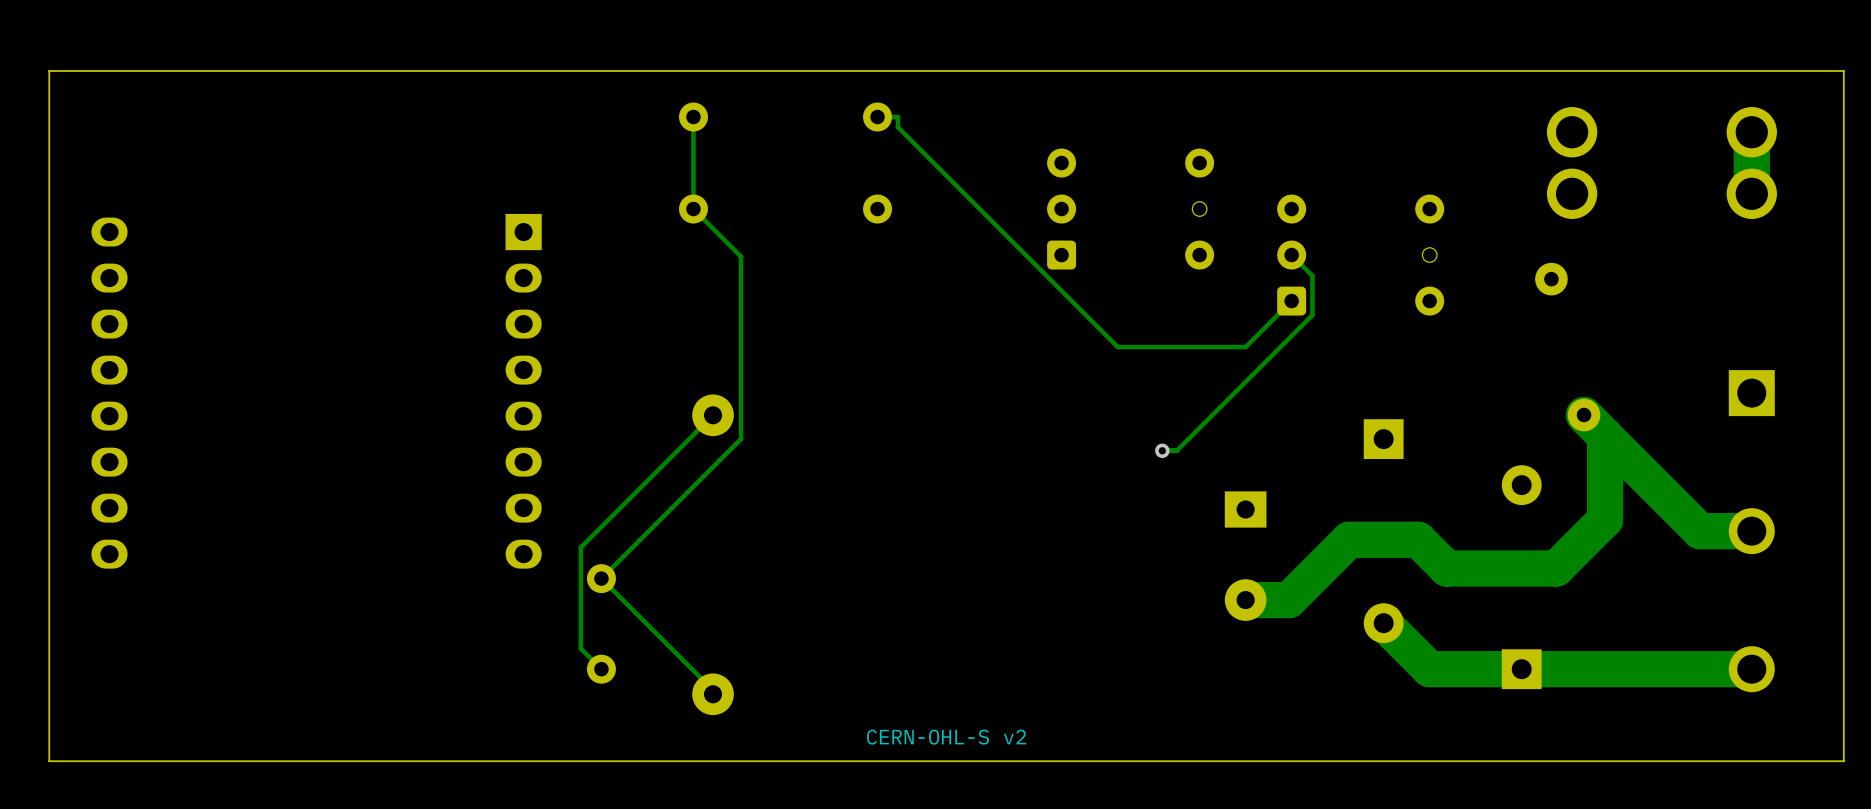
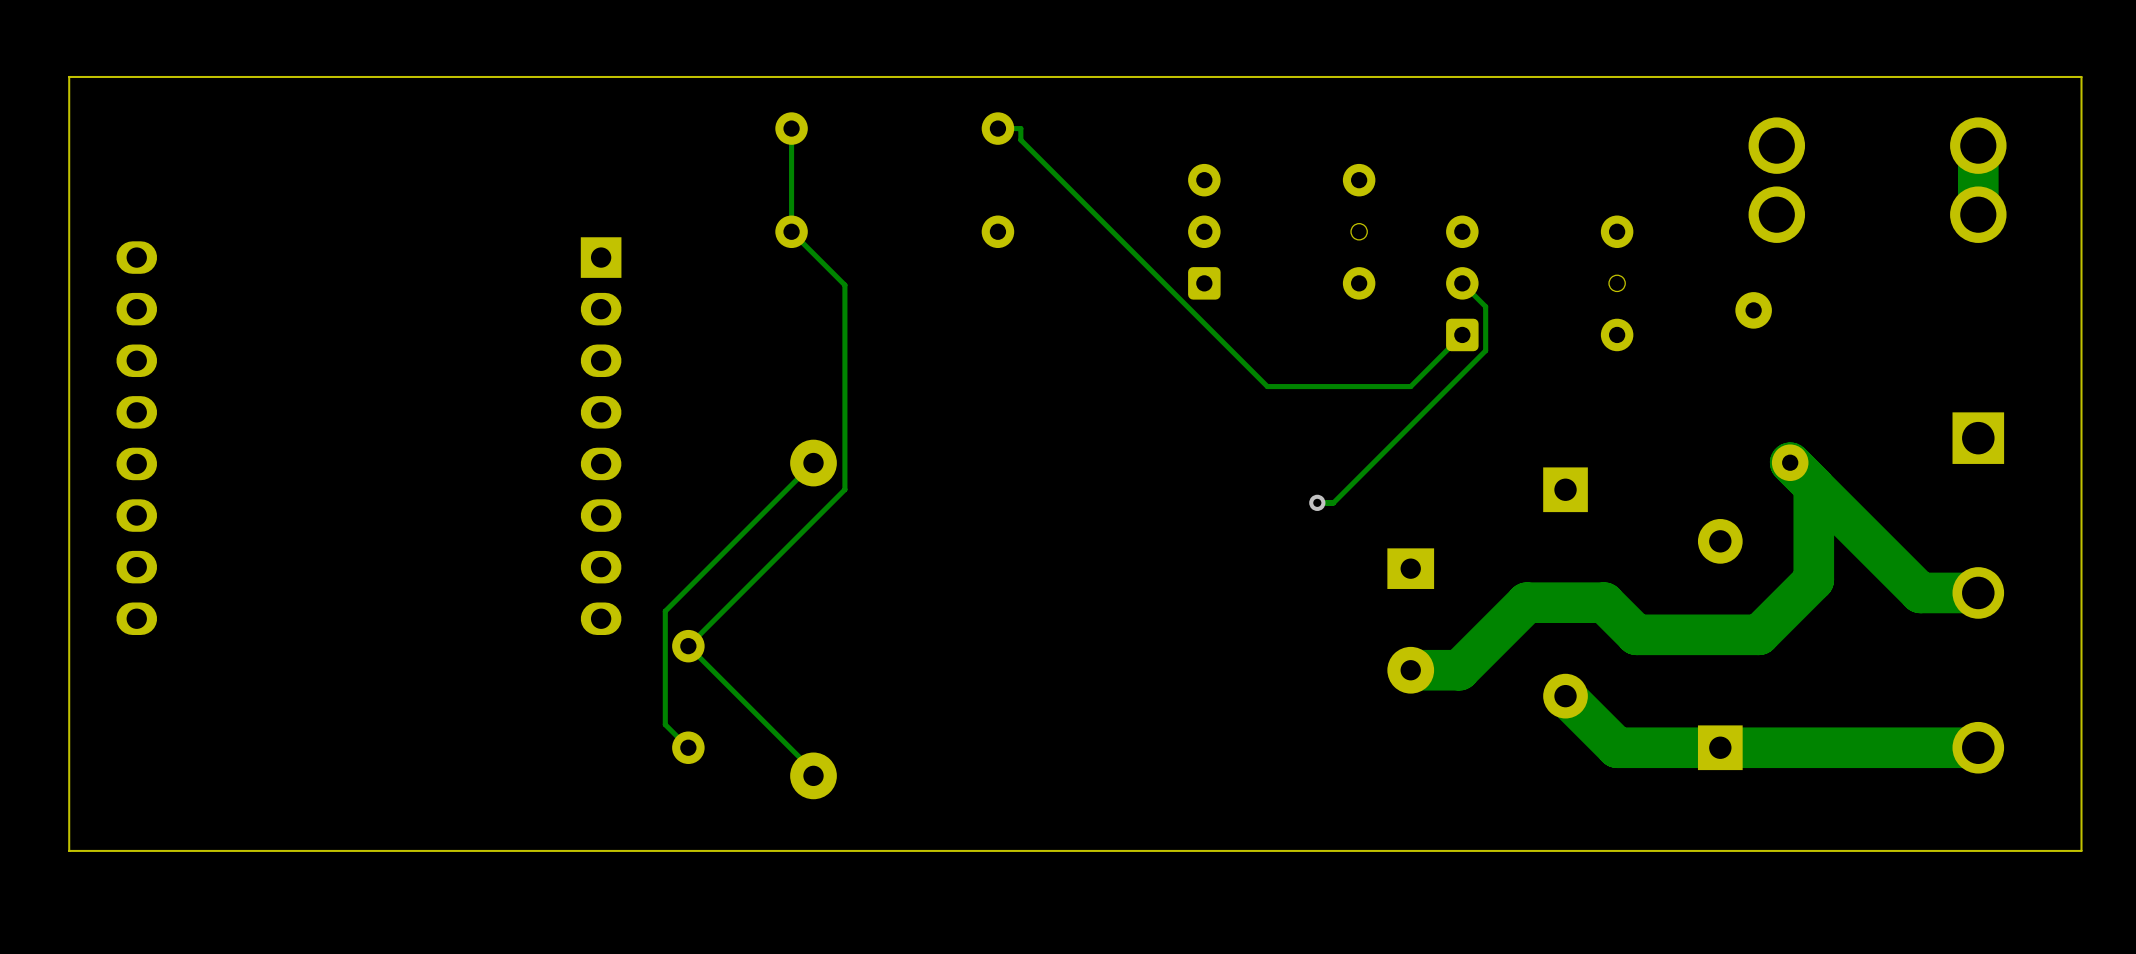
text: CERN-OHL-S v2 (946, 737) -> none

